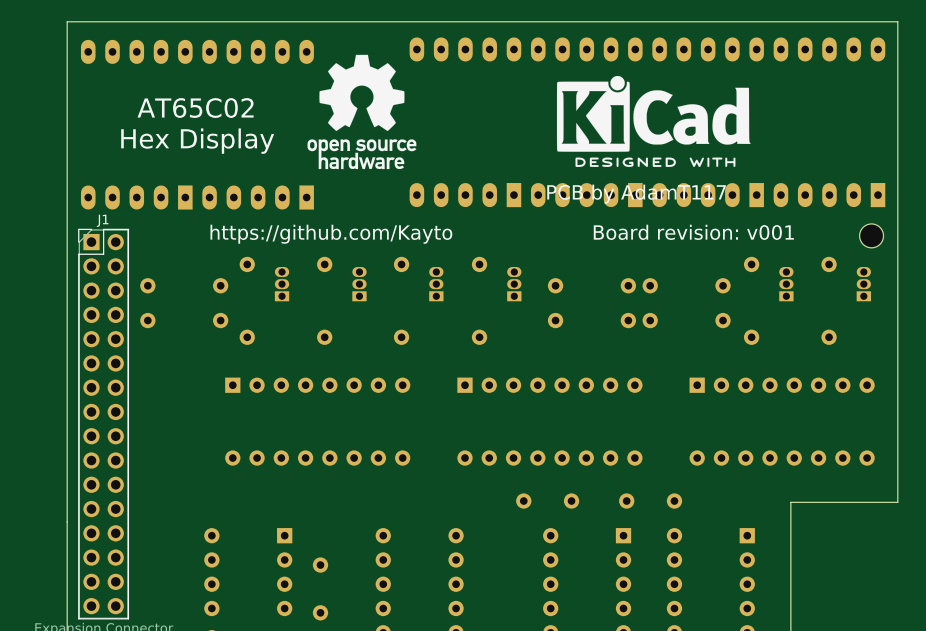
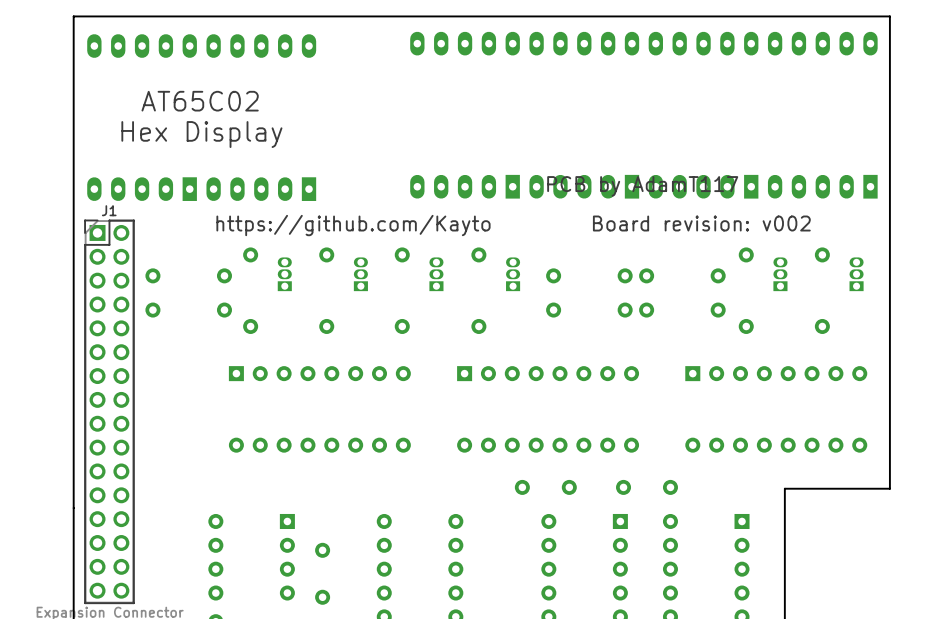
drawing: [307, 54, 417, 170] -> none
drawing: [556, 75, 751, 167] -> none
text: Board revision: v001 (693, 232) -> Board revision: v002 (701, 223)
part: (871, 235) -> none

